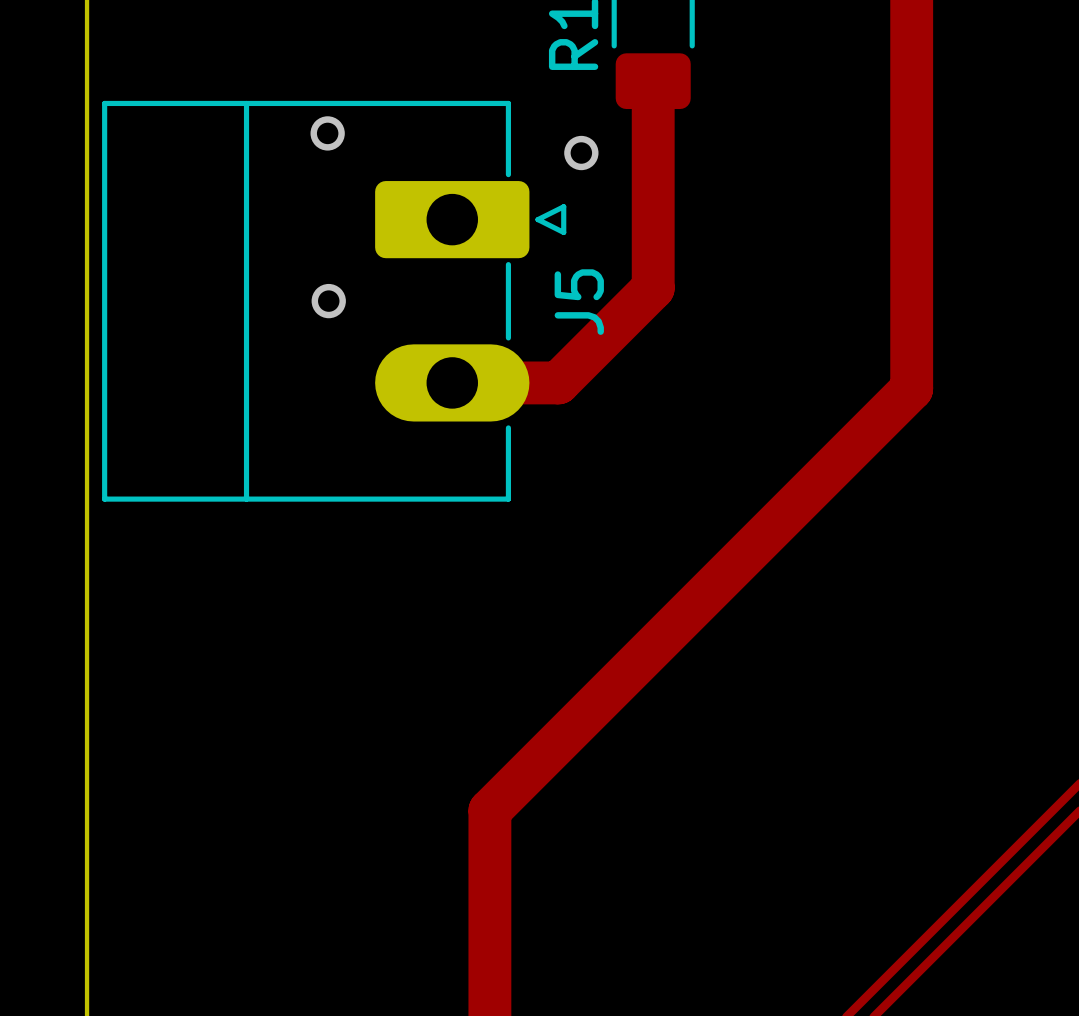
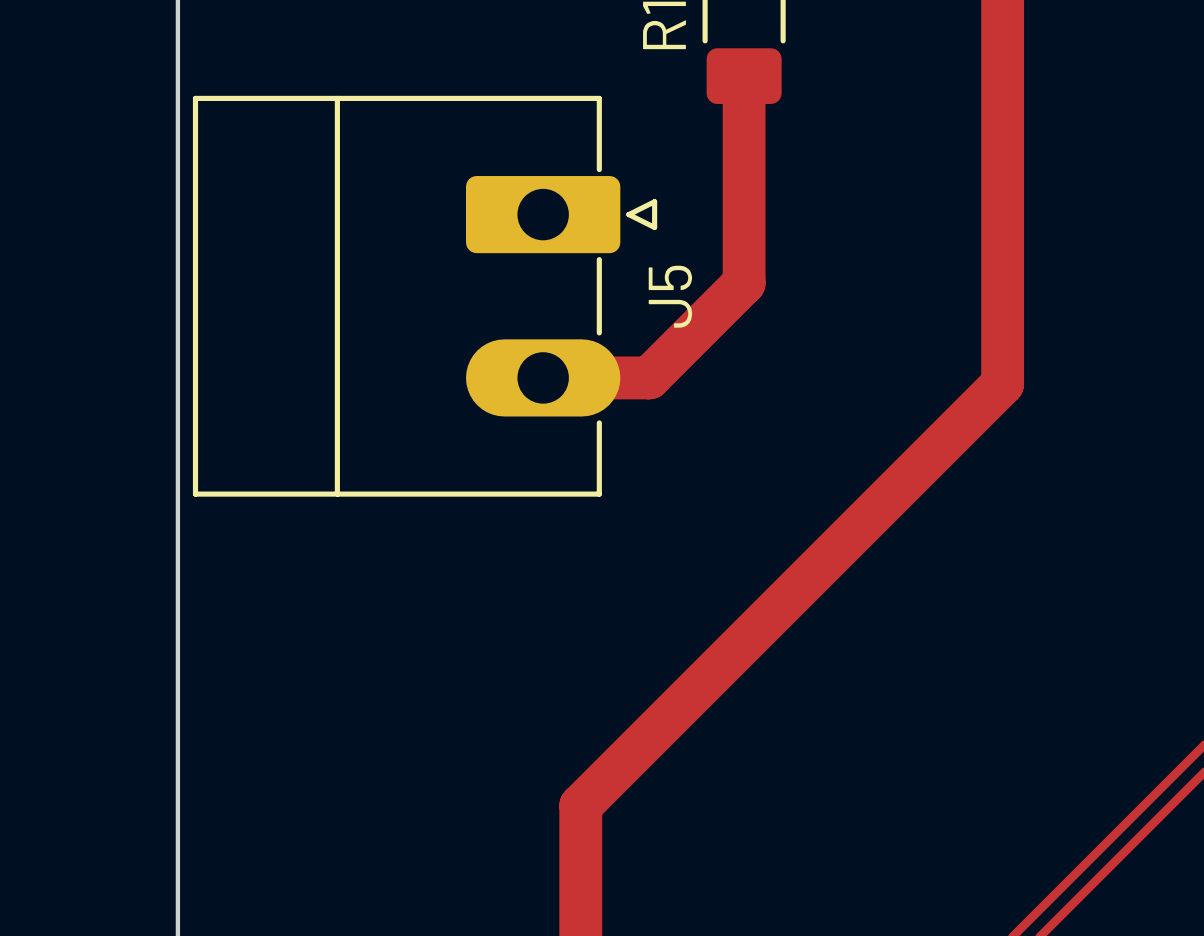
via: (327, 133) -> none
via: (581, 153) -> none
via: (328, 301) -> none

